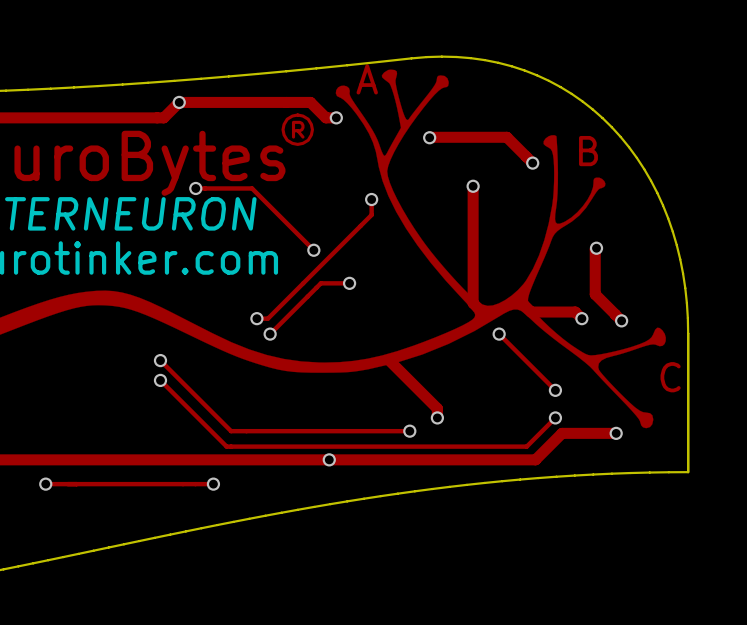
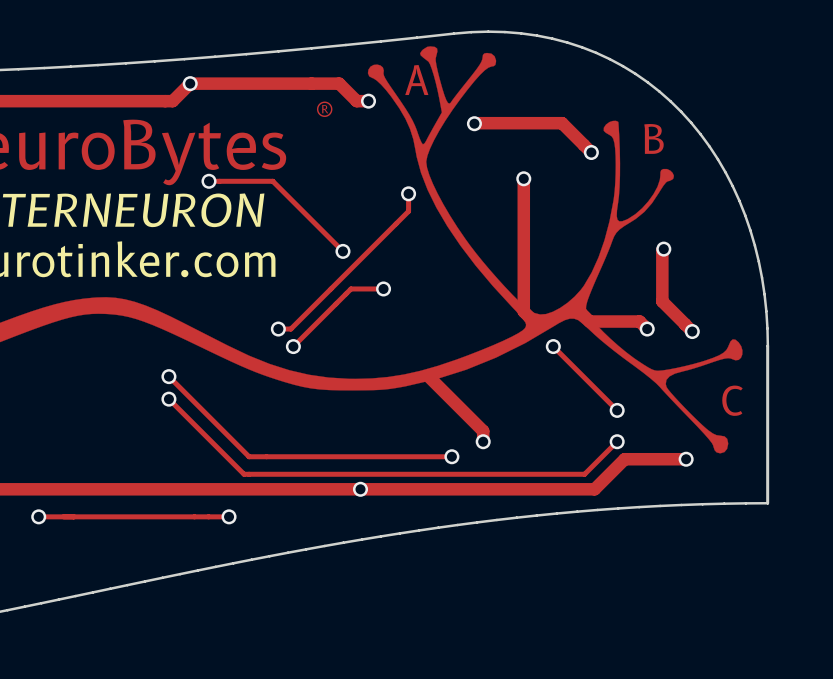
text position: A (367, 79) -> A (416, 80)
text position: C (670, 377) -> C (732, 400)

